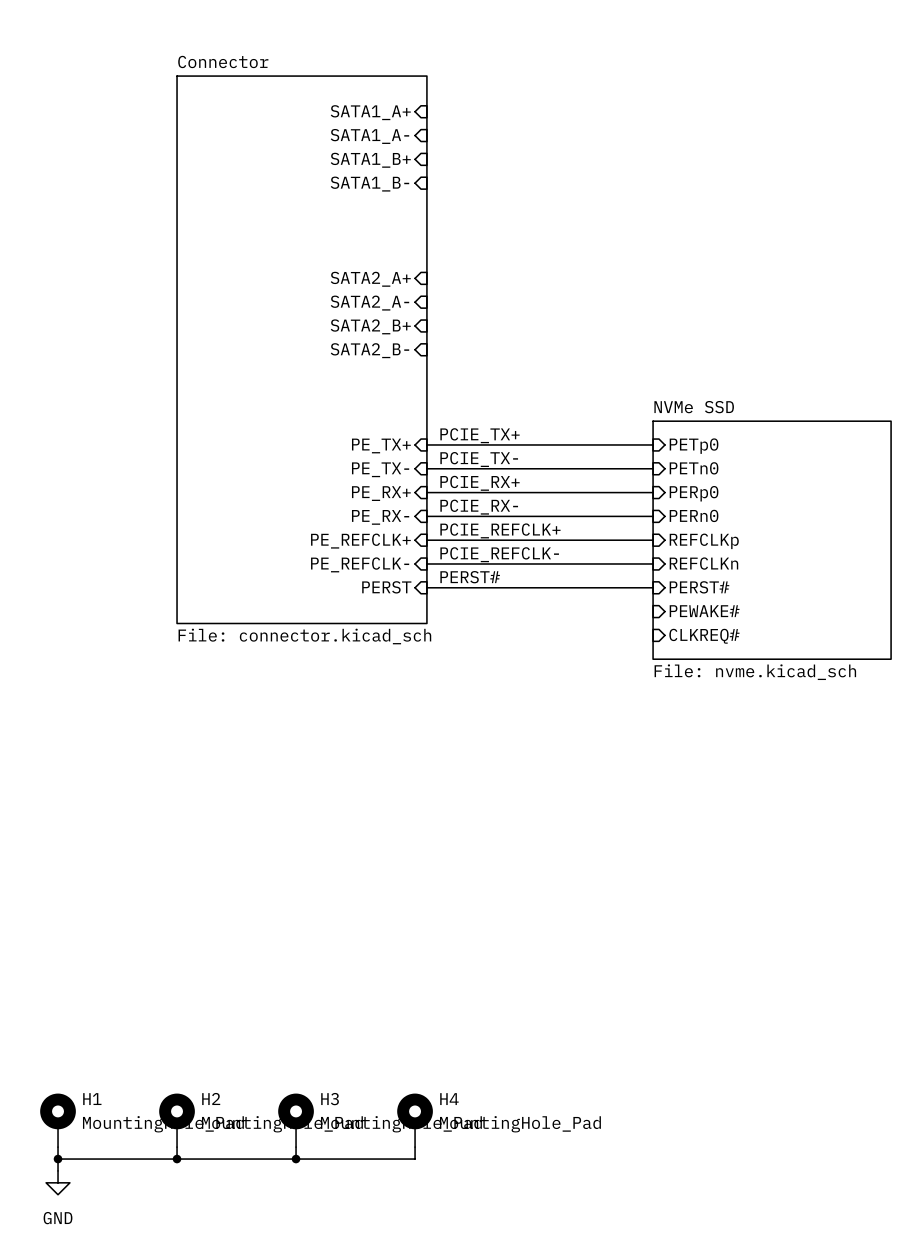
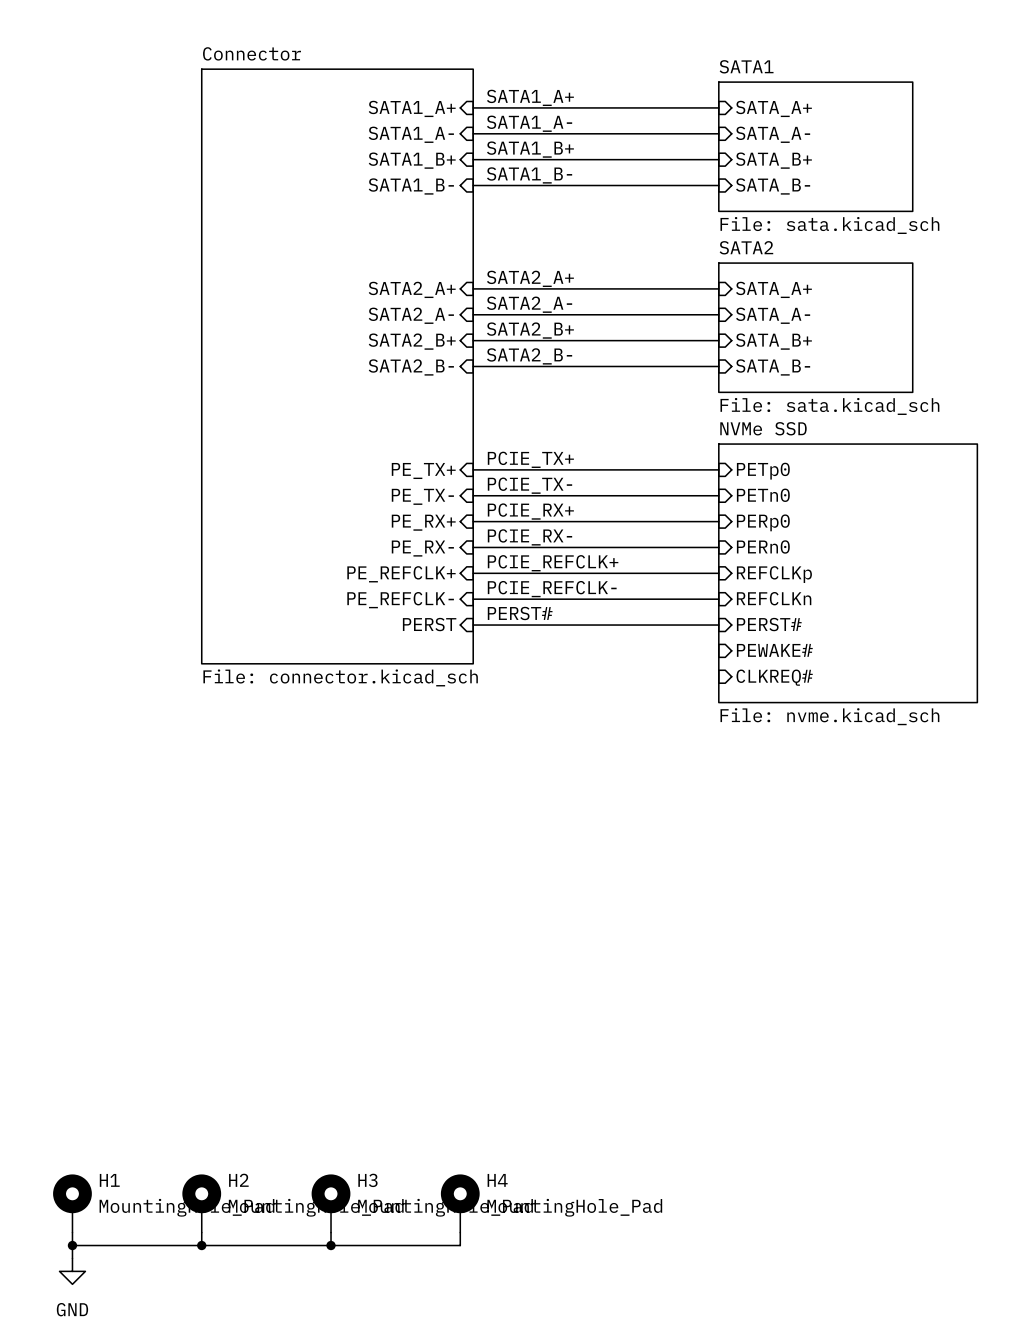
label: none -> SATA1_A+ (530, 97)
wire: none -> (473, 107) (718, 107)
sheet pin: none -> SATA_A+ (773, 108)
label: none -> SATA1_A- (529, 123)
wire: none -> (473, 133) (718, 133)
sheet pin: none -> SATA_A- (773, 134)
sheet SATA1: none -> File: sata.kicad_sch (815, 146)
label: none -> SATA1_B+ (530, 149)
wire: none -> (473, 159) (718, 159)
sheet pin: none -> SATA_B+ (773, 160)
label: none -> SATA1_B- (529, 175)
wire: none -> (473, 185) (718, 185)
sheet pin: none -> SATA_B- (773, 186)
label: none -> SATA2_A+ (530, 278)
wire: none -> (473, 288) (718, 288)
sheet pin: none -> SATA_A+ (773, 289)
label: none -> SATA2_A- (529, 304)
wire: none -> (473, 314) (718, 314)
sheet pin: none -> SATA_A- (773, 315)
sheet SATA2: none -> File: sata.kicad_sch (815, 327)
label: none -> SATA2_B+ (530, 330)
wire: none -> (473, 340) (718, 340)
sheet pin: none -> SATA_B+ (773, 341)
label: none -> SATA2_B- (529, 356)
wire: none -> (473, 366) (718, 366)
sheet pin: none -> SATA_B- (773, 367)

